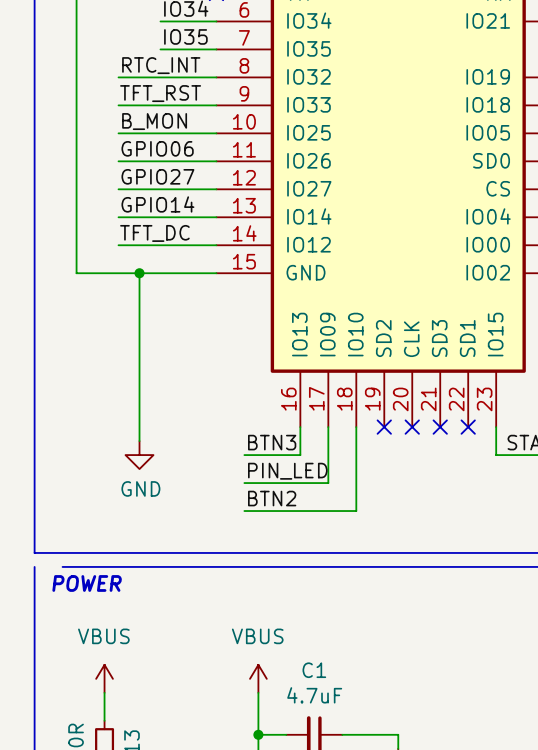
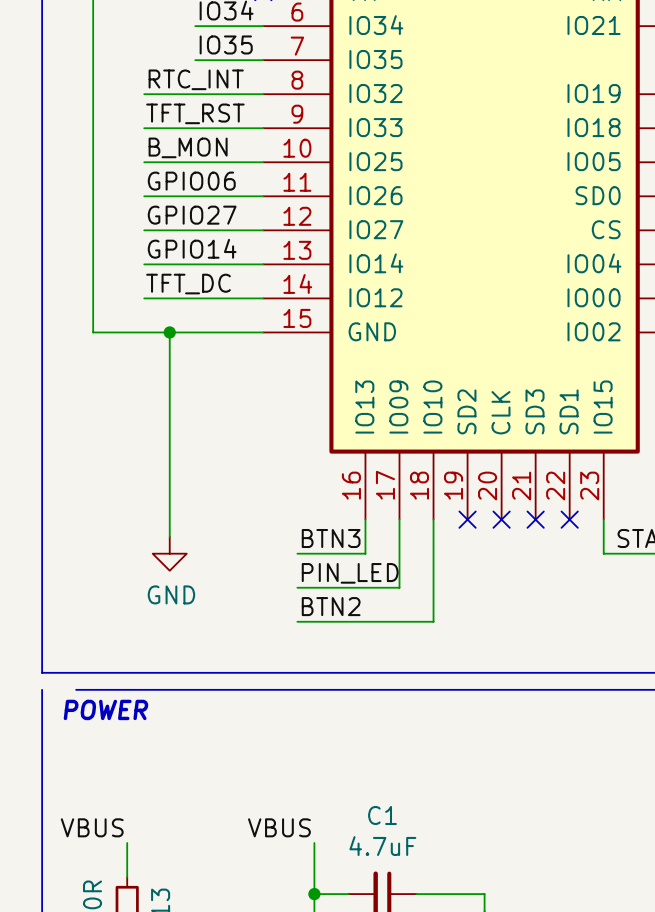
power symbol: VBUS (104, 678) -> none
power symbol: VBUS (258, 678) -> none
label: none -> VBUS (92, 827)
label: none -> VBUS (279, 827)

